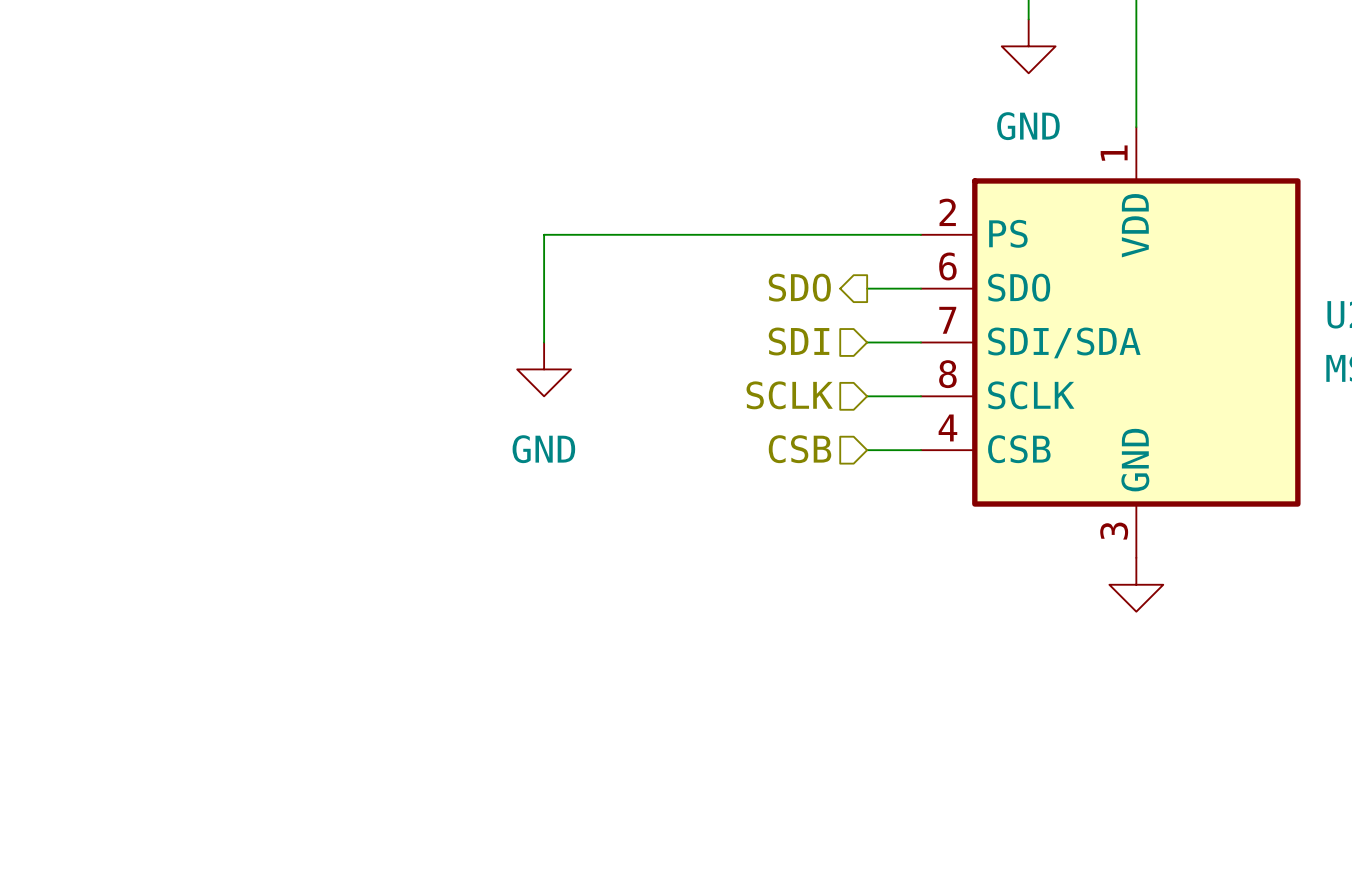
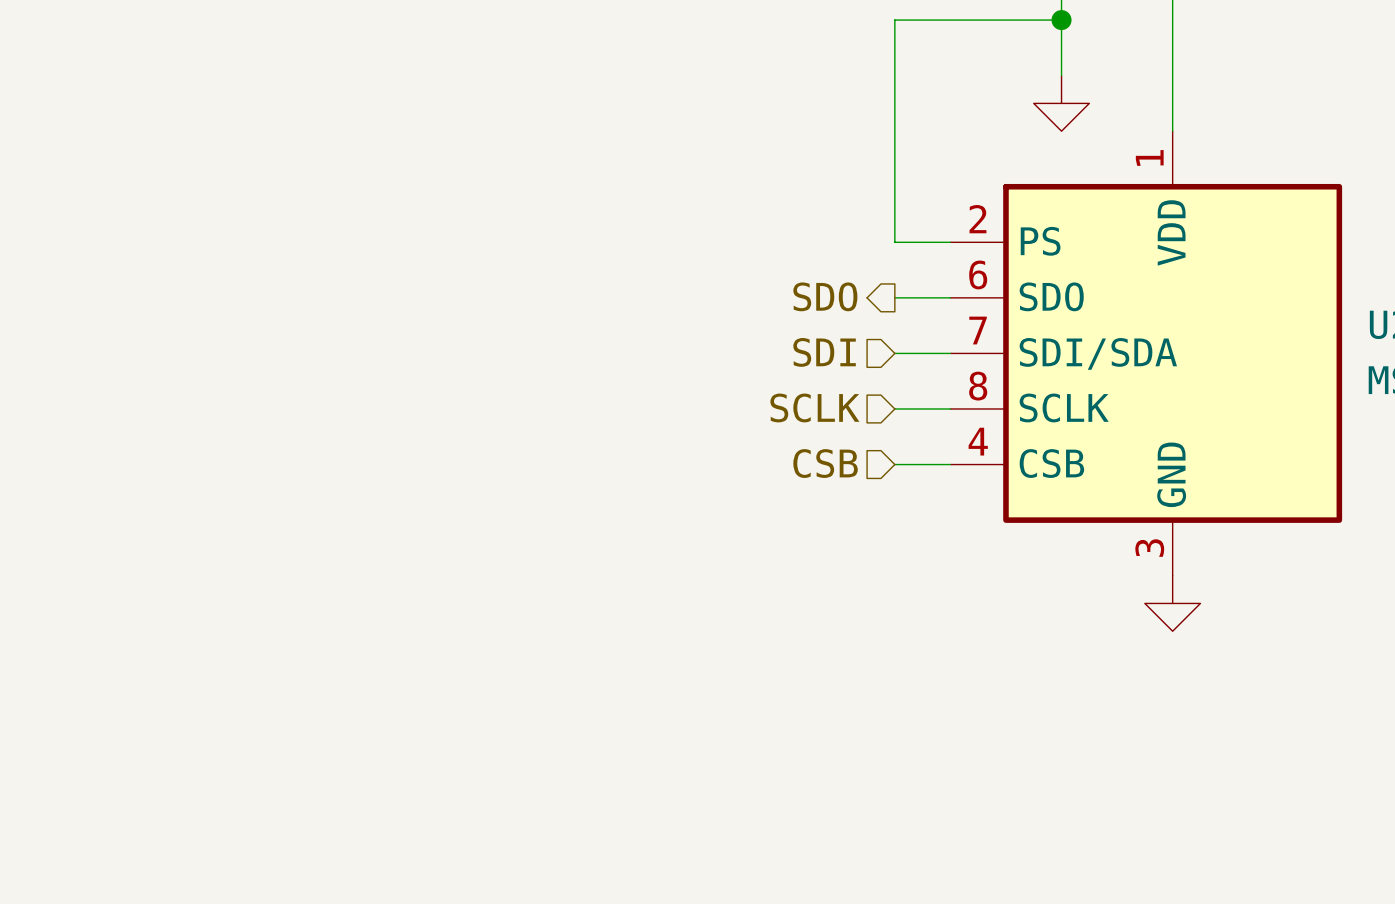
junction: none -> (1061, 20)
power symbol: GND (1028, 46) -> none
power symbol: none -> (1061, 103)
wire: (867, 234) (544, 234) (544, 342) -> (894, 242) (894, 20) (1061, 20) (1061, 75)
power symbol: GND (544, 369) -> none

